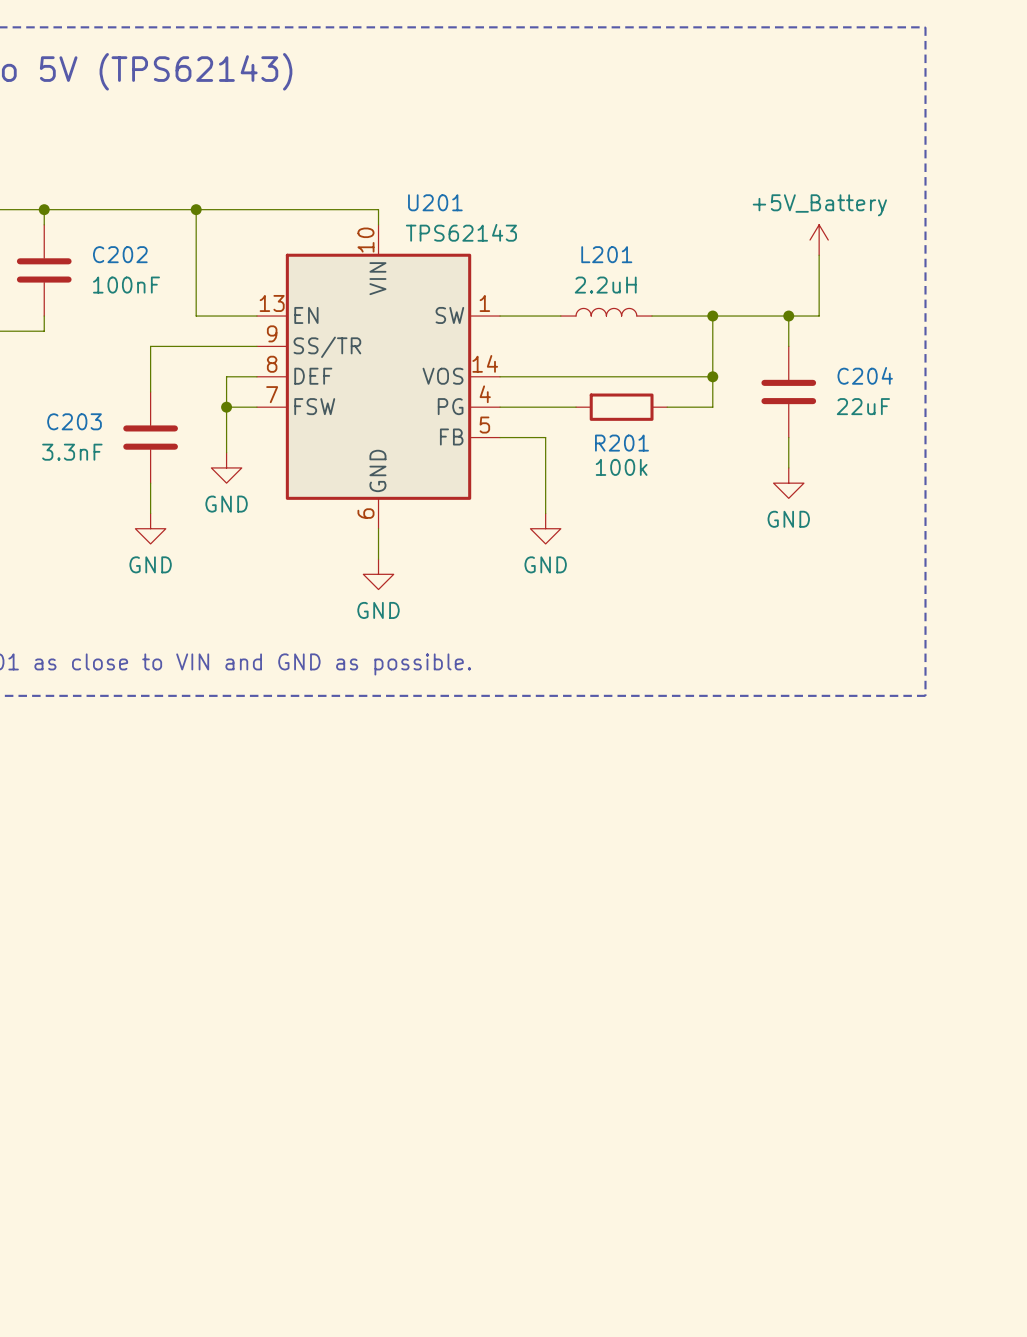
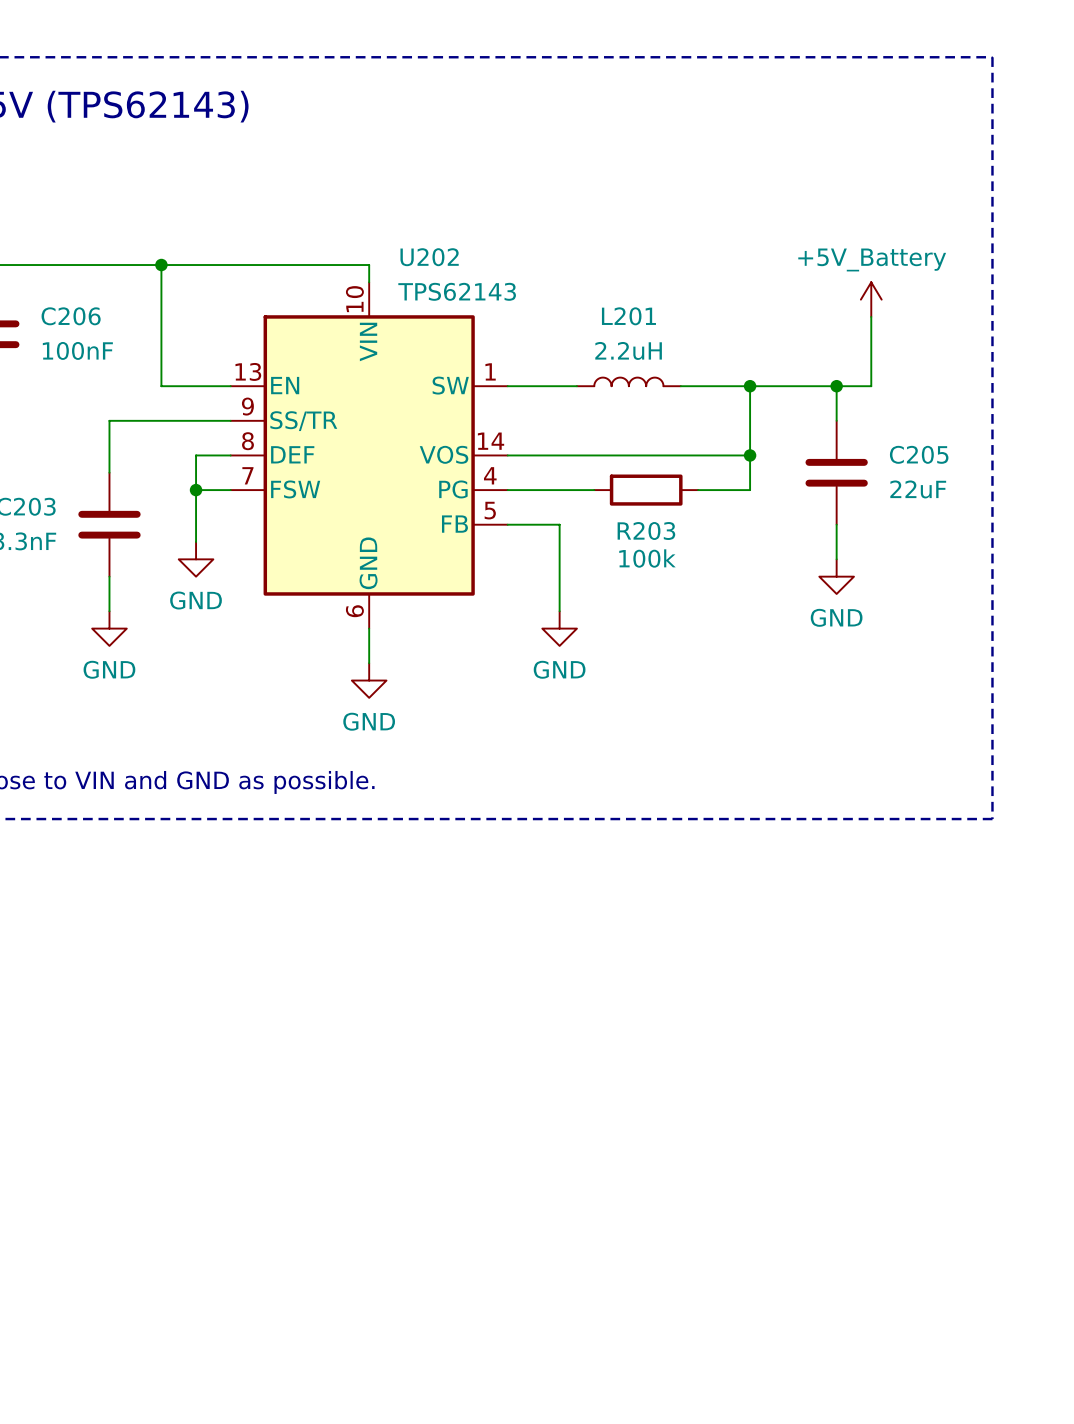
U201 name: U201 (435, 202) -> U202 (429, 257)
C202 name: C202 (120, 254) -> C206 (71, 316)
C204 name: C204 (865, 375) -> C205 (919, 454)
R201 name: R201 (621, 443) -> R203 (646, 531)

